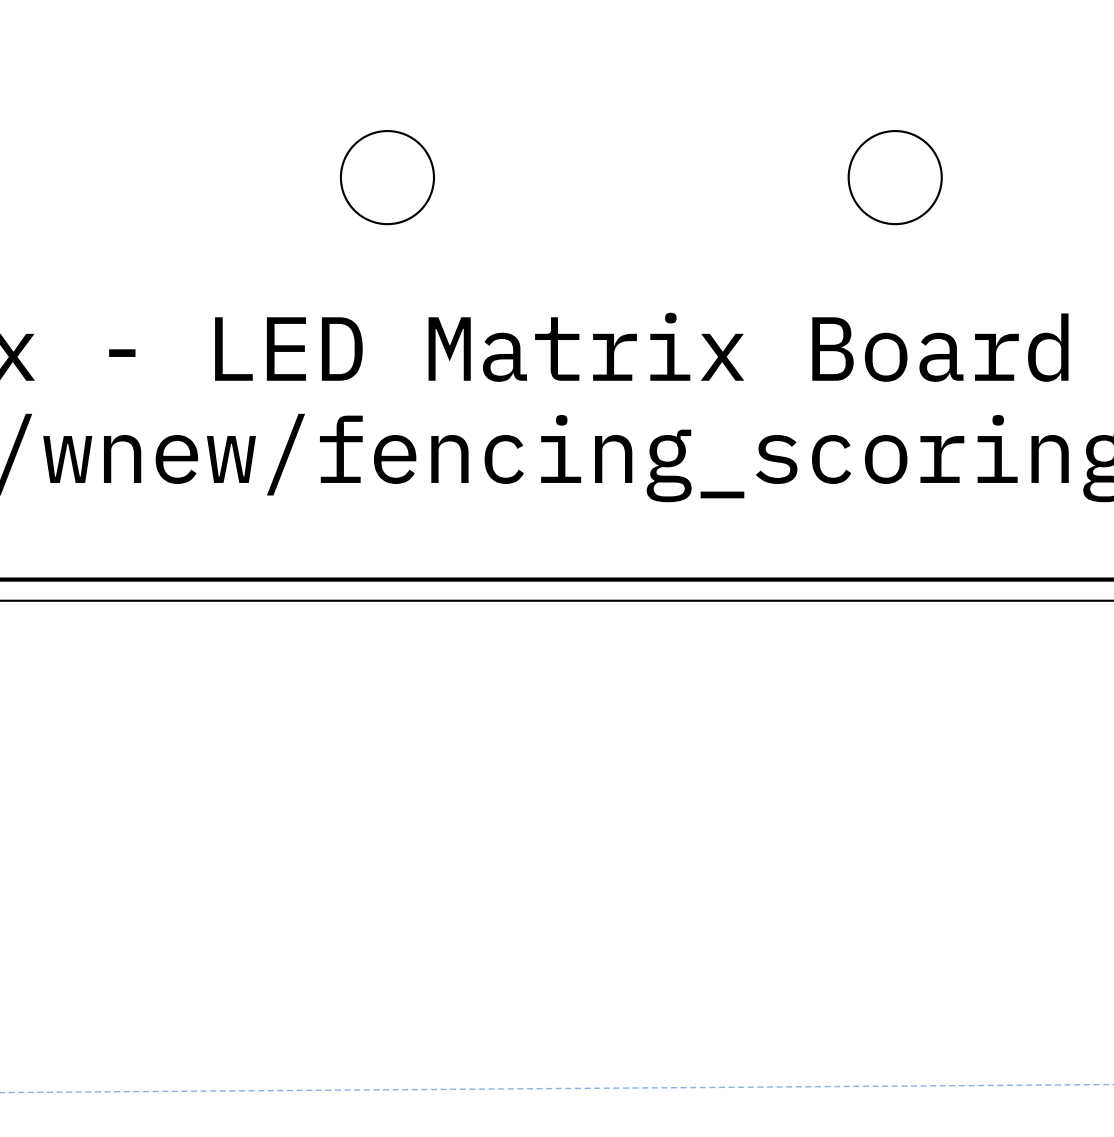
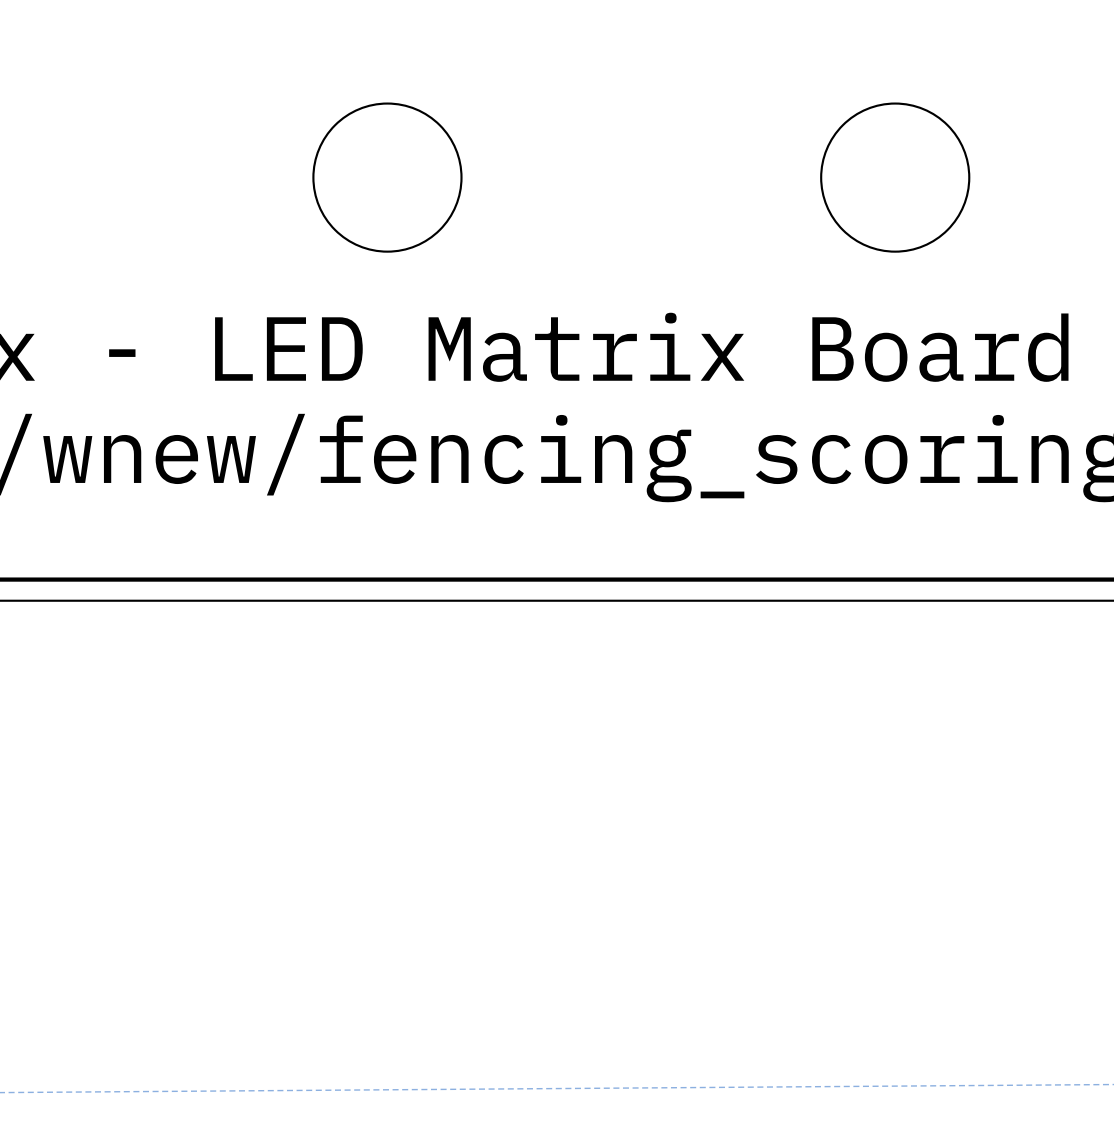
round board edge size: [339, 129, 436, 226] -> [312, 102, 463, 253]
round board edge size: [847, 129, 943, 226] -> [820, 102, 971, 253]

